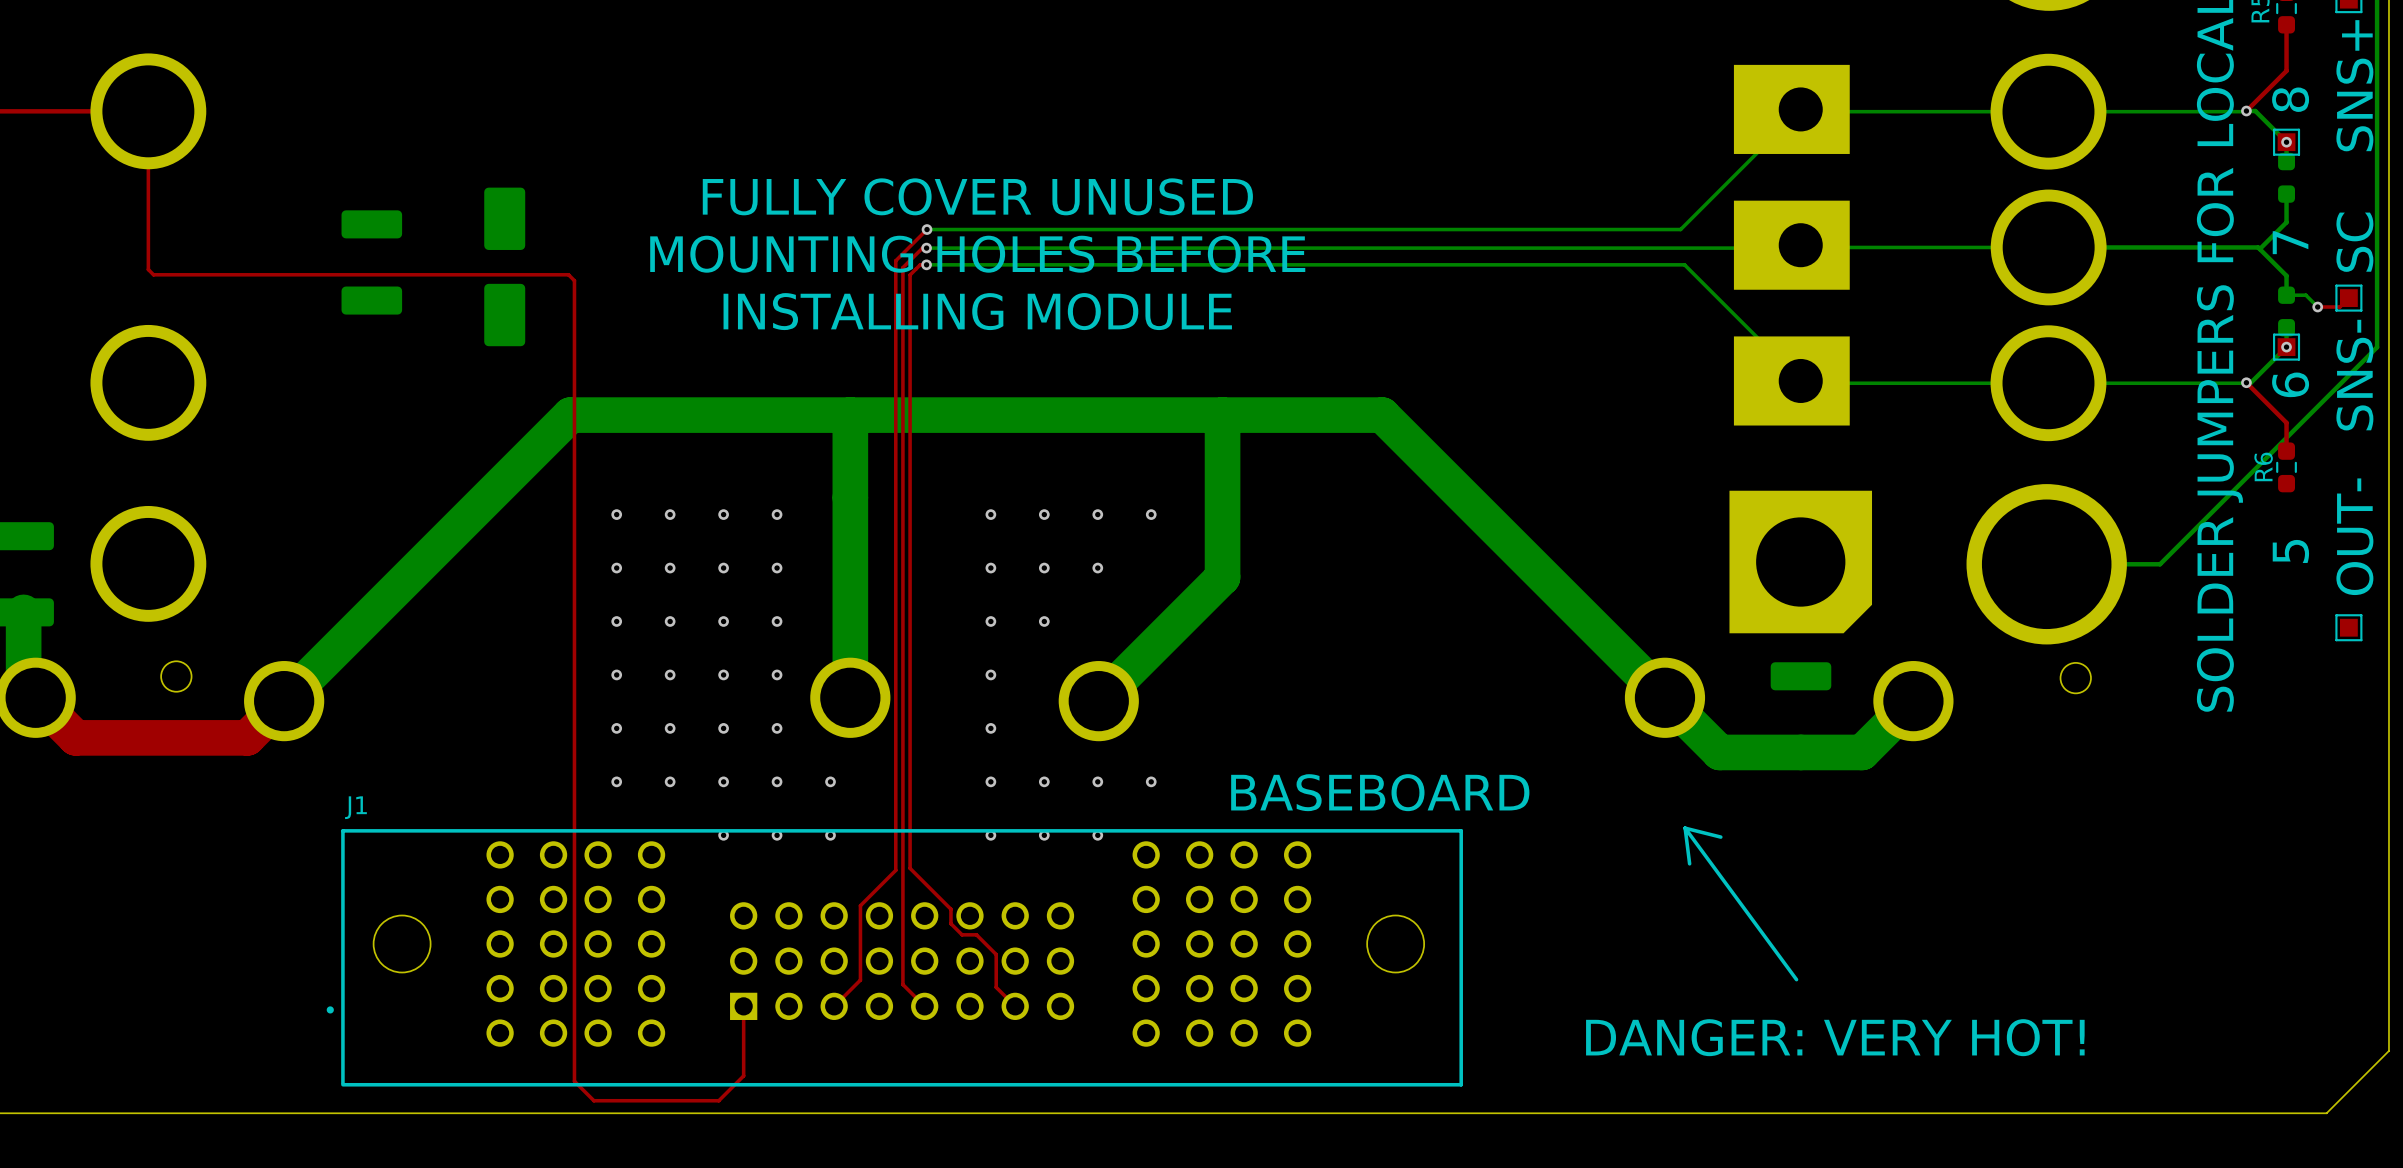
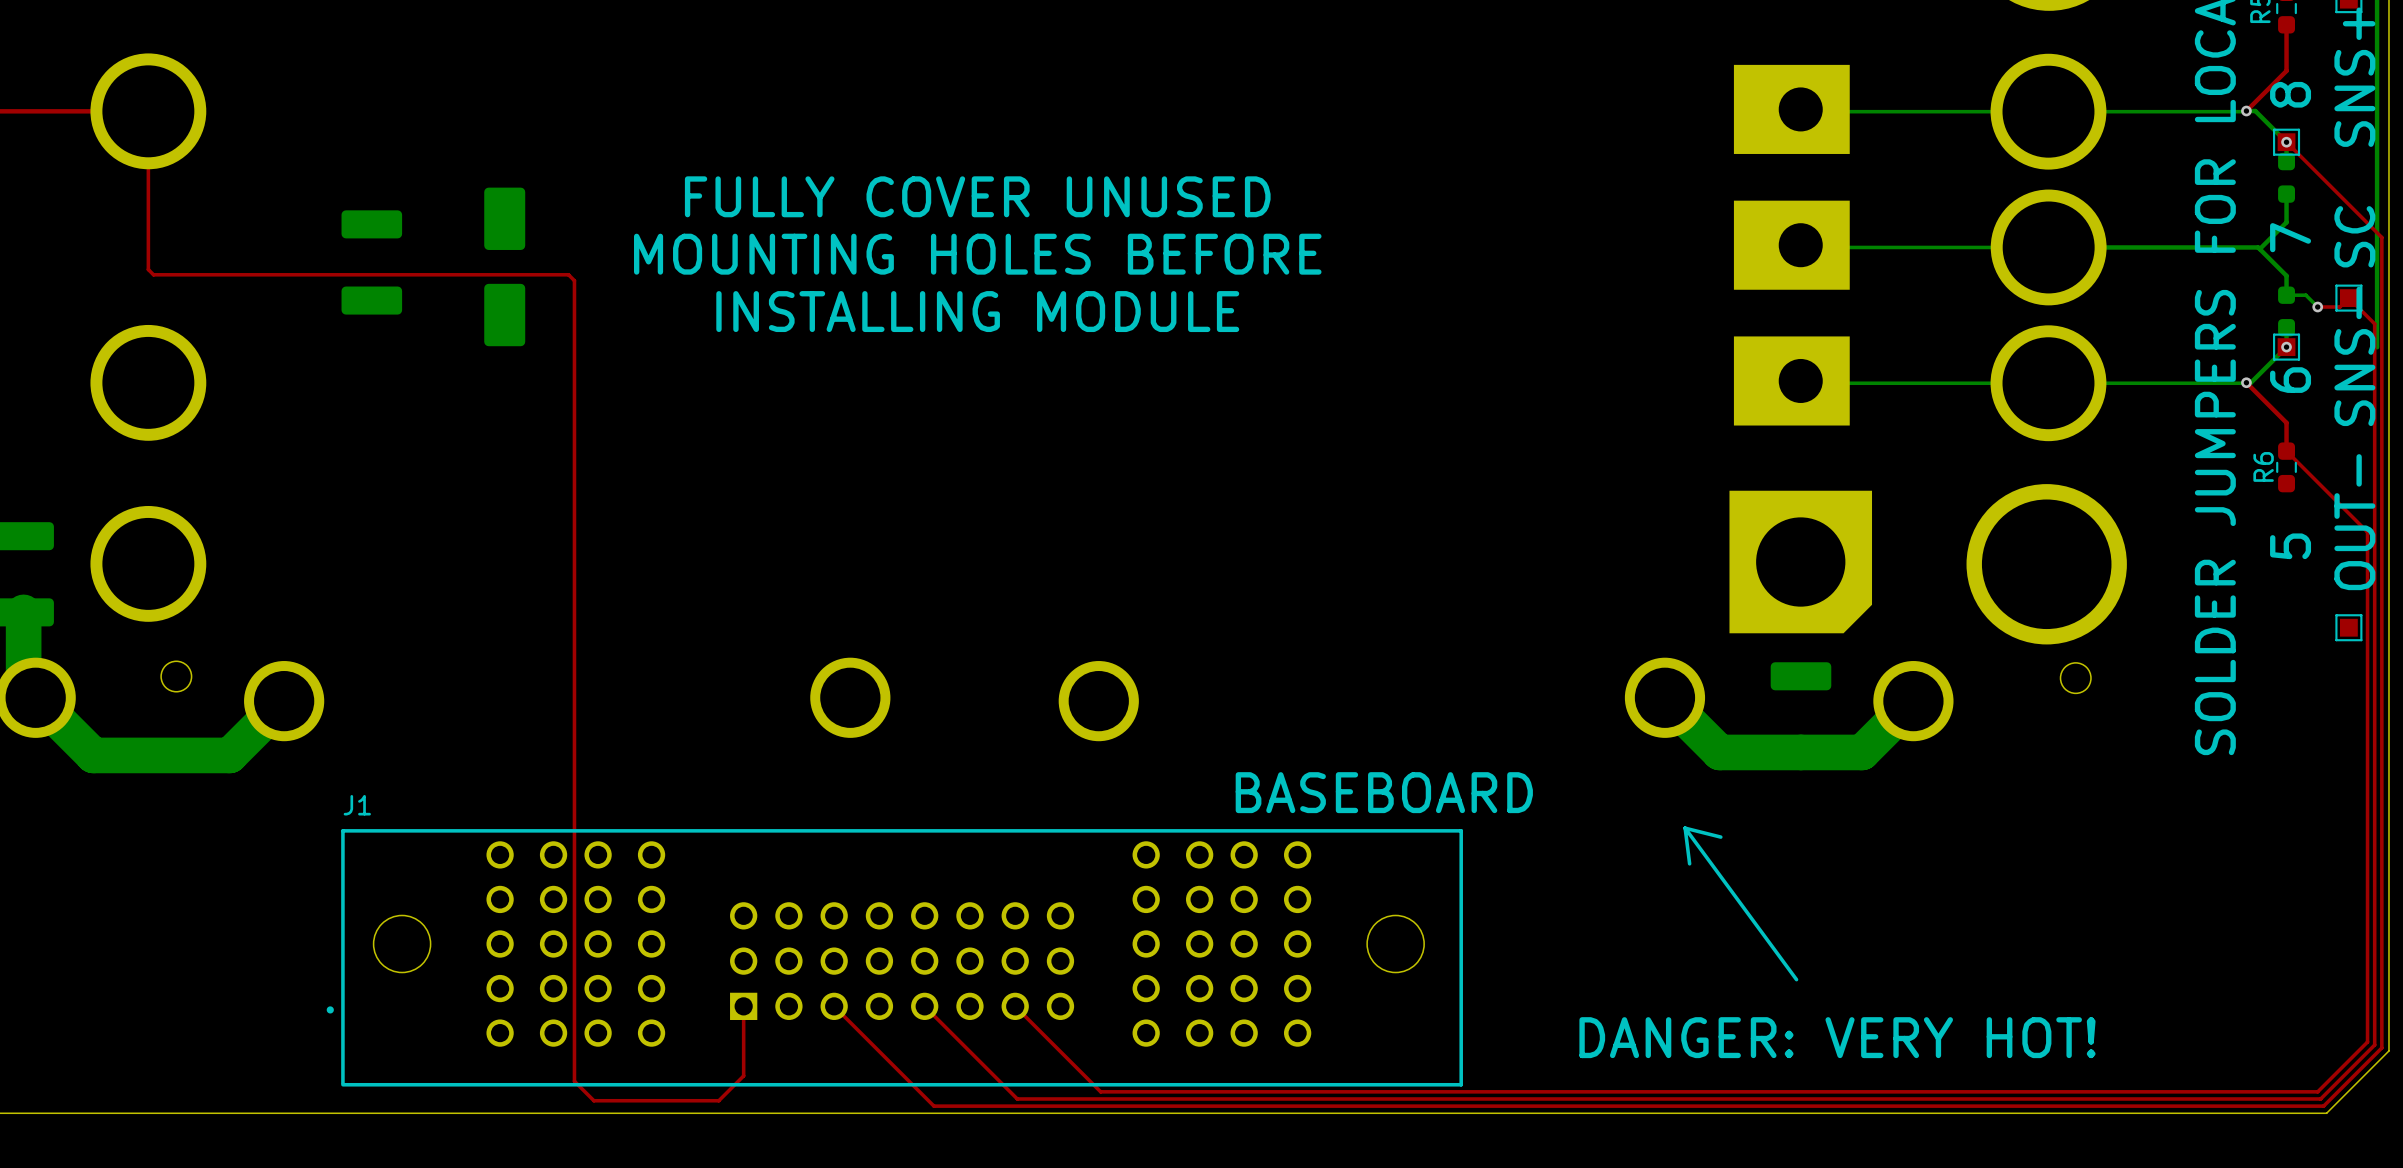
bottom track: (1800, 109) (1680, 229) (927, 229) -> none
top track: (927, 229) (895, 260) (895, 870) (860, 905) (860, 980) (834, 1006) -> (2286, 142) (2381, 237) (2381, 1047) (2323, 1106) (933, 1106) (834, 1006)
via: (927, 229) -> none
bottom track: (1800, 245) (1797, 248) (926, 248) -> none
top track: (926, 248) (922, 248) (902, 267) (902, 984) (924, 1006) -> (2348, 298) (2374, 323) (2374, 1044) (2320, 1098) (1017, 1098) (924, 1006)
via: (926, 248) -> none
bottom track: (926, 264) (1684, 264) (1800, 380) -> none
top track: (926, 264) (920, 264) (910, 274) (910, 868) (950, 909) (950, 923) (962, 934) (976, 934) (996, 954) (996, 987) (1015, 1006) -> (2286, 451) (2367, 532) (2367, 1042) (2317, 1091) (1100, 1091) (1015, 1006)
via: (926, 264) -> none
bottom track: (2377, 347) (2160, 564) (2046, 564) -> none
bottom track: (850, 415) (850, 697) -> none
bottom track: (1222, 415) (1222, 577) (1098, 701) -> none
via: (616, 514) -> none
via: (670, 514) -> none
via: (723, 514) -> none
via: (777, 514) -> none
via: (990, 514) -> none
via: (1044, 514) -> none
via: (1097, 514) -> none
via: (1151, 514) -> none
via: (616, 568) -> none
via: (670, 568) -> none
via: (723, 568) -> none
via: (777, 568) -> none
via: (990, 568) -> none
via: (1044, 568) -> none
via: (1097, 568) -> none
via: (616, 621) -> none
via: (670, 621) -> none
via: (723, 621) -> none
via: (777, 621) -> none
via: (990, 621) -> none
via: (1044, 621) -> none
via: (616, 674) -> none
via: (670, 674) -> none
via: (723, 674) -> none
via: (777, 674) -> none
via: (990, 674) -> none
top track: (35, 697) (75, 737) (247, 737) (284, 701) -> none
bottom track: (1664, 697) (1382, 415) (570, 415) (284, 701) -> (35, 697) (93, 755) (229, 755) (284, 701)
via: (616, 728) -> none
via: (670, 728) -> none
via: (723, 728) -> none
via: (777, 728) -> none
via: (990, 728) -> none
via: (616, 781) -> none
via: (670, 781) -> none
via: (723, 781) -> none
via: (777, 781) -> none
via: (830, 781) -> none
via: (990, 781) -> none
via: (1044, 781) -> none
via: (1097, 781) -> none
via: (1151, 781) -> none
via: (723, 835) -> none
via: (777, 835) -> none
via: (830, 835) -> none
via: (990, 835) -> none
via: (1044, 835) -> none
via: (1097, 835) -> none

